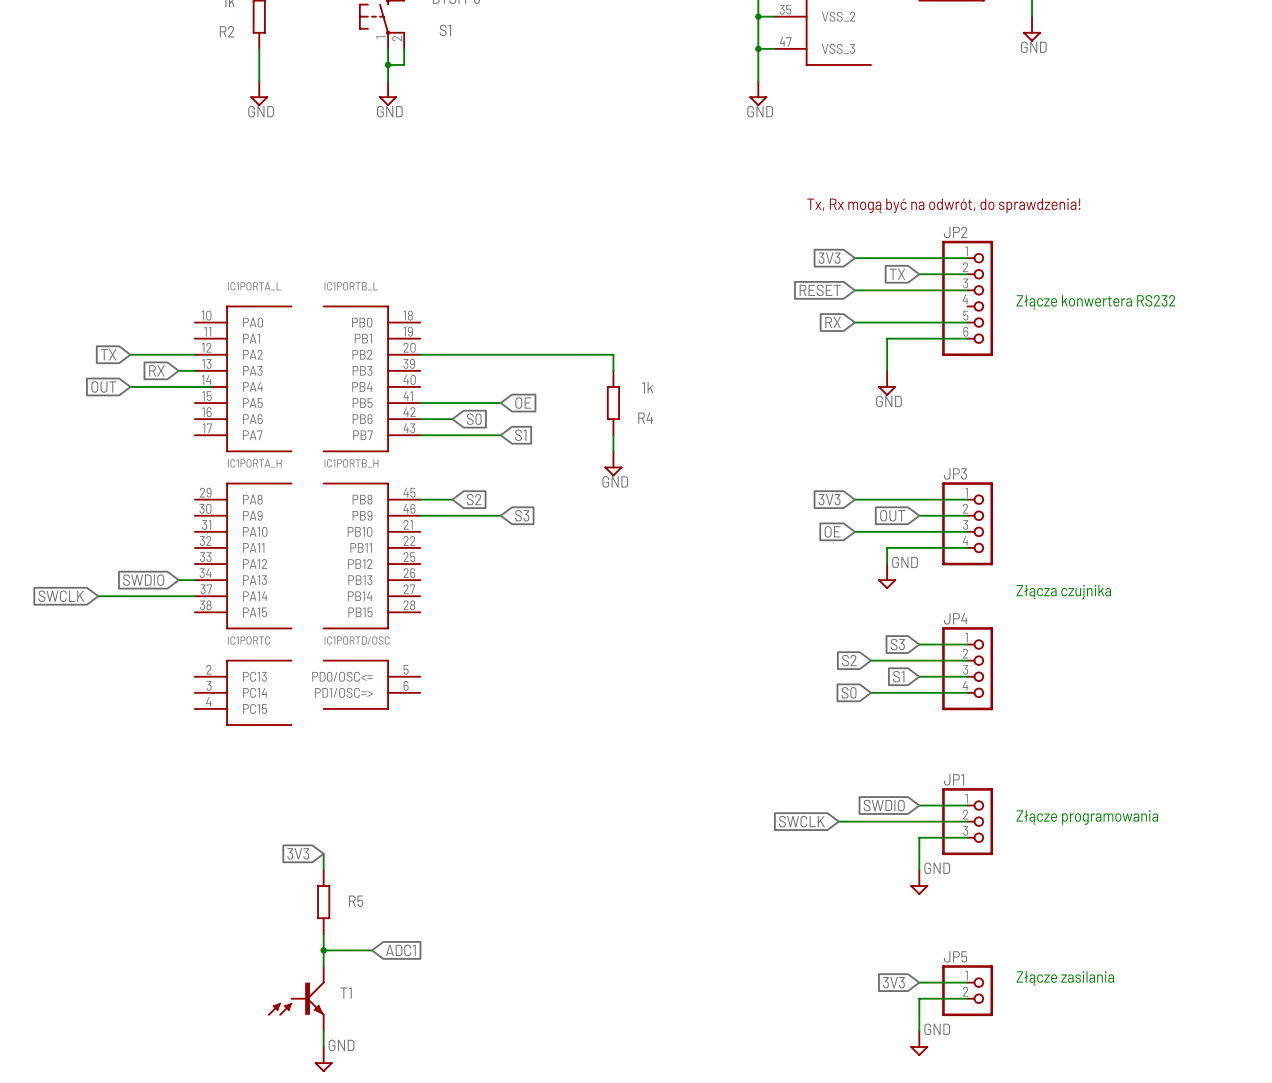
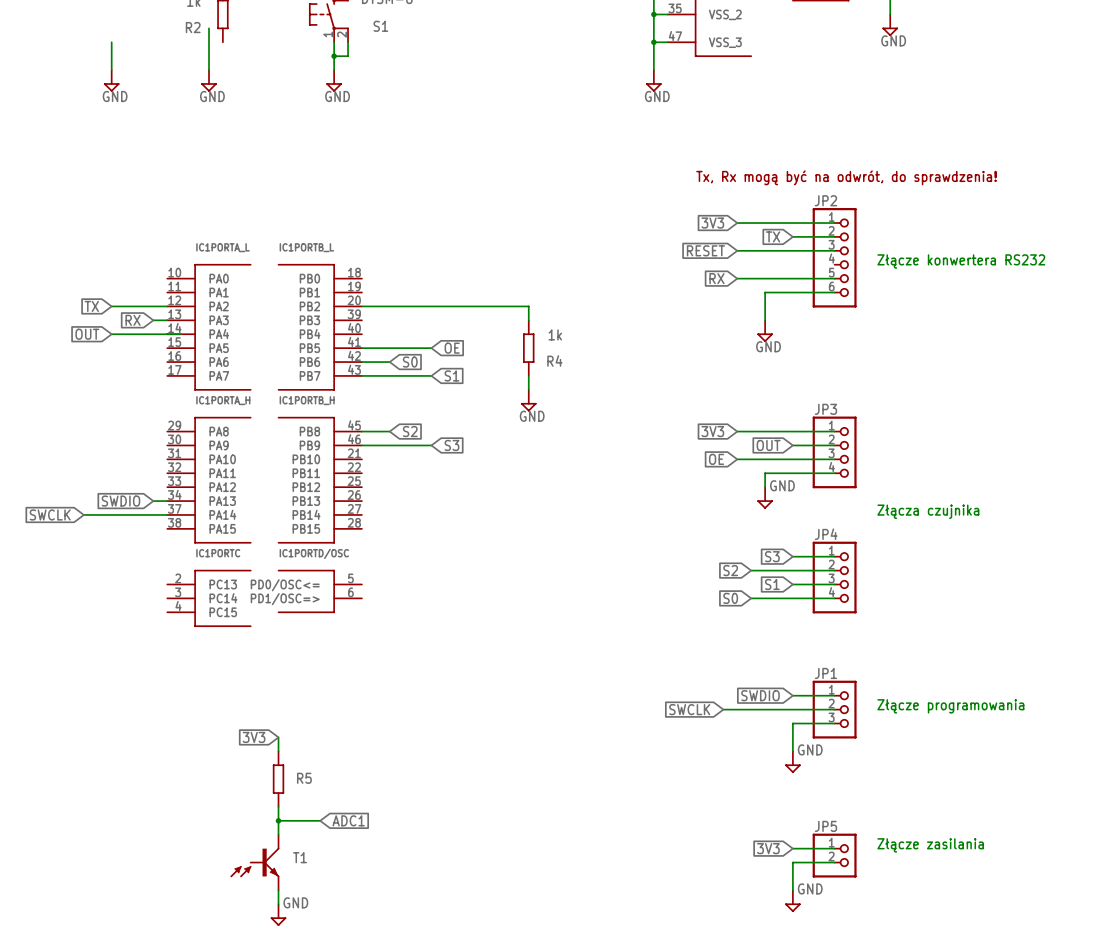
wire: none -> (208, 28) (208, 70)
wire: (259, 48) (259, 81) -> (111, 42) (111, 70)
power symbol: none -> GND (111, 80)
power symbol position: GND (259, 93) -> GND (208, 80)

